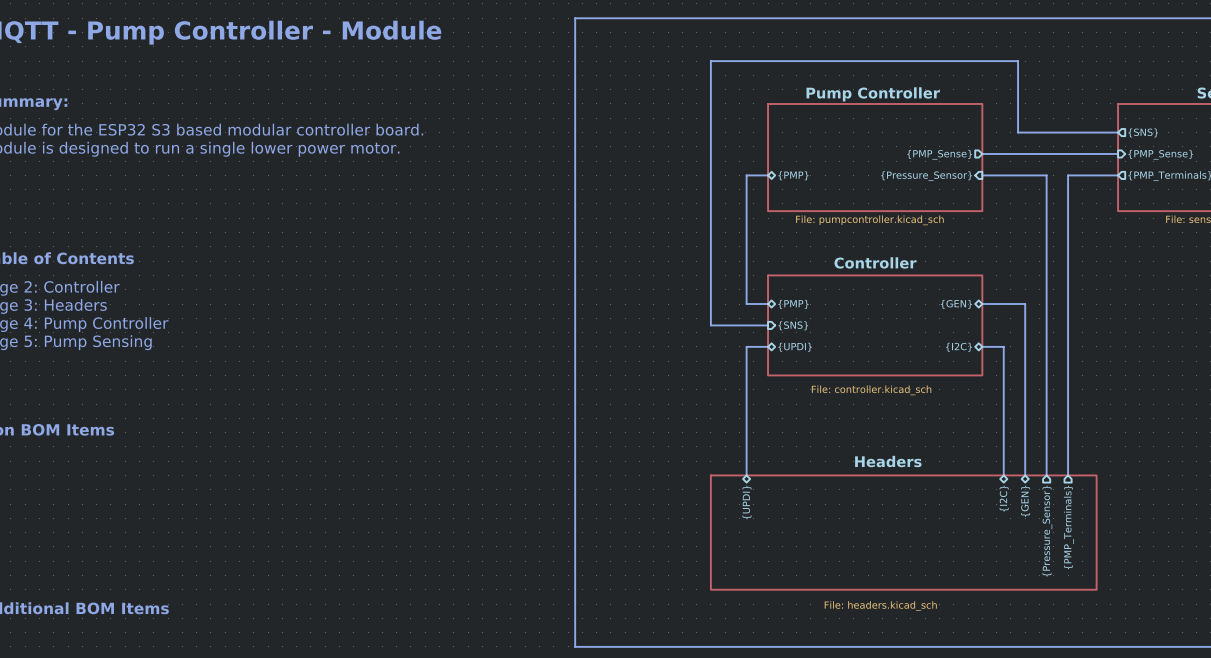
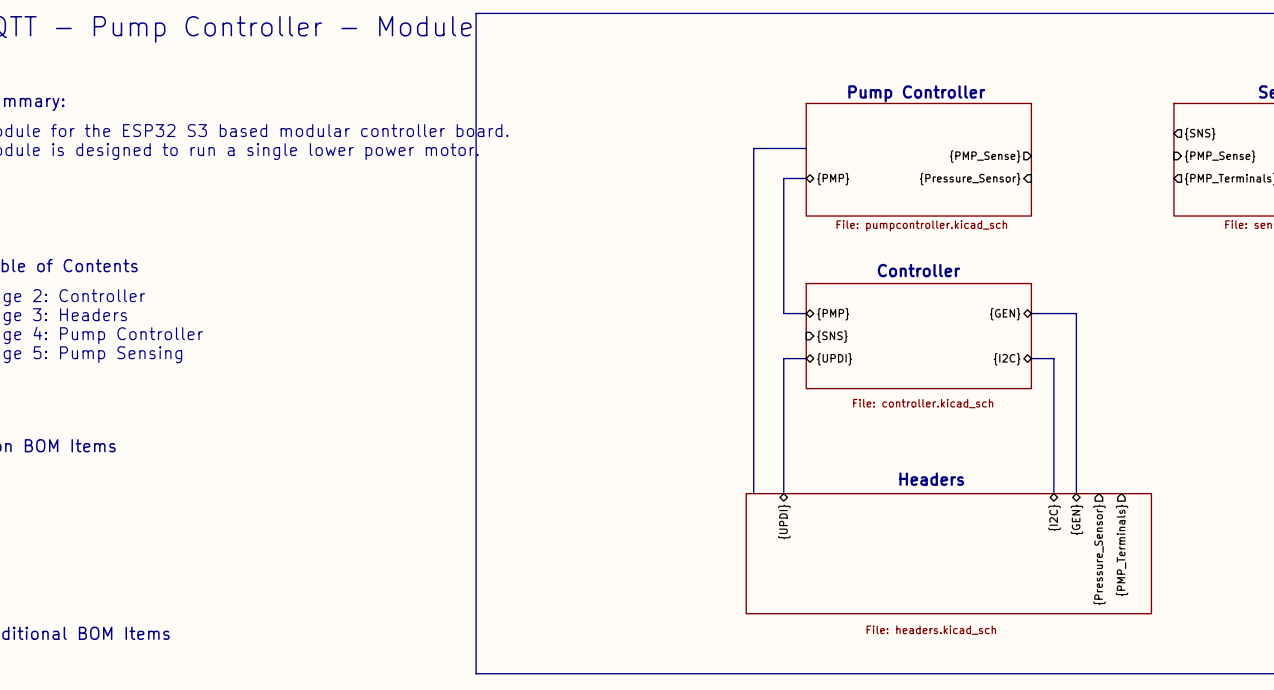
line: (575, 18) (575, 646) -> (603, 13) (476, 13) (476, 673) (603, 673)
bus: (1118, 132) (1018, 132) (1018, 61) (710, 61) (710, 325) (768, 325) -> none
bus: none -> (806, 148) (753, 148) (753, 493)
bus: (982, 153) (1118, 153) -> none
bus: (982, 175) (1046, 175) (1046, 475) -> none
bus: (1118, 175) (1068, 175) (1068, 475) -> none

